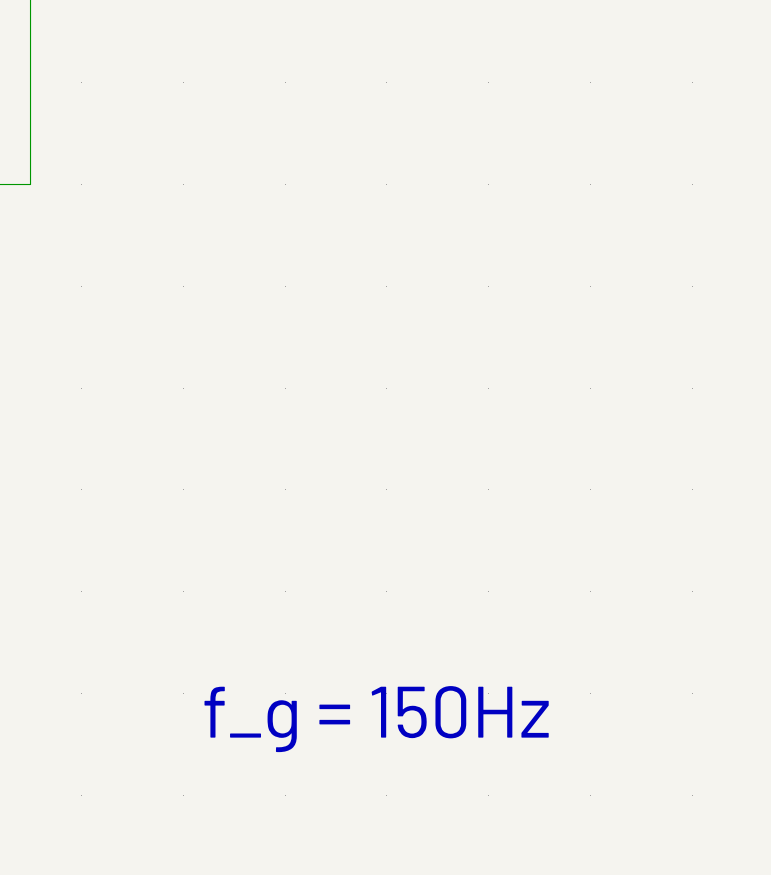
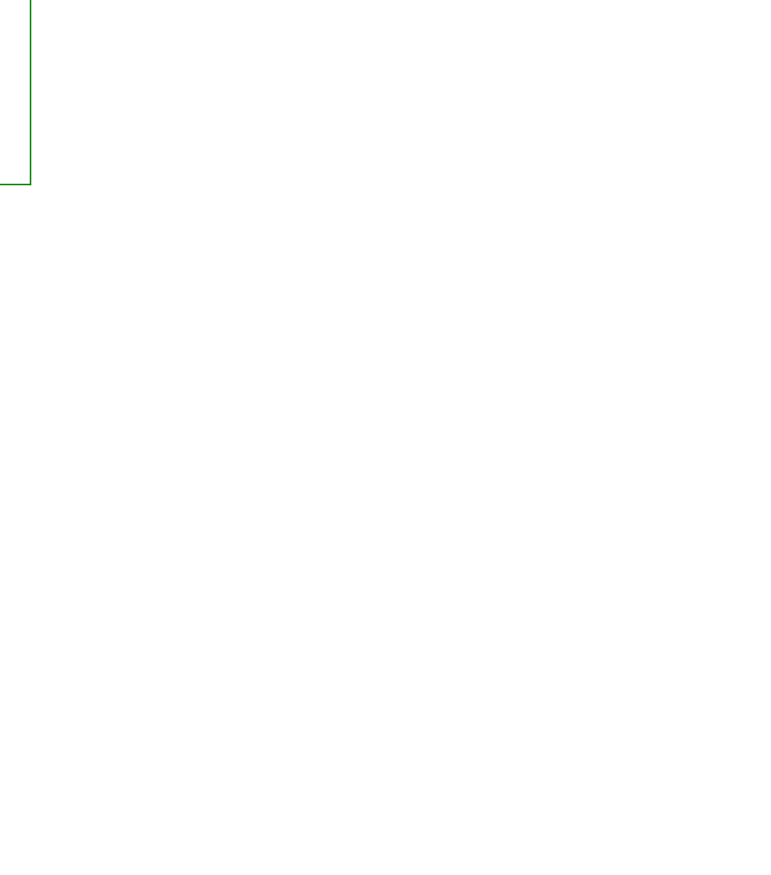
text: f_g = 150Hz (376, 719) -> none

